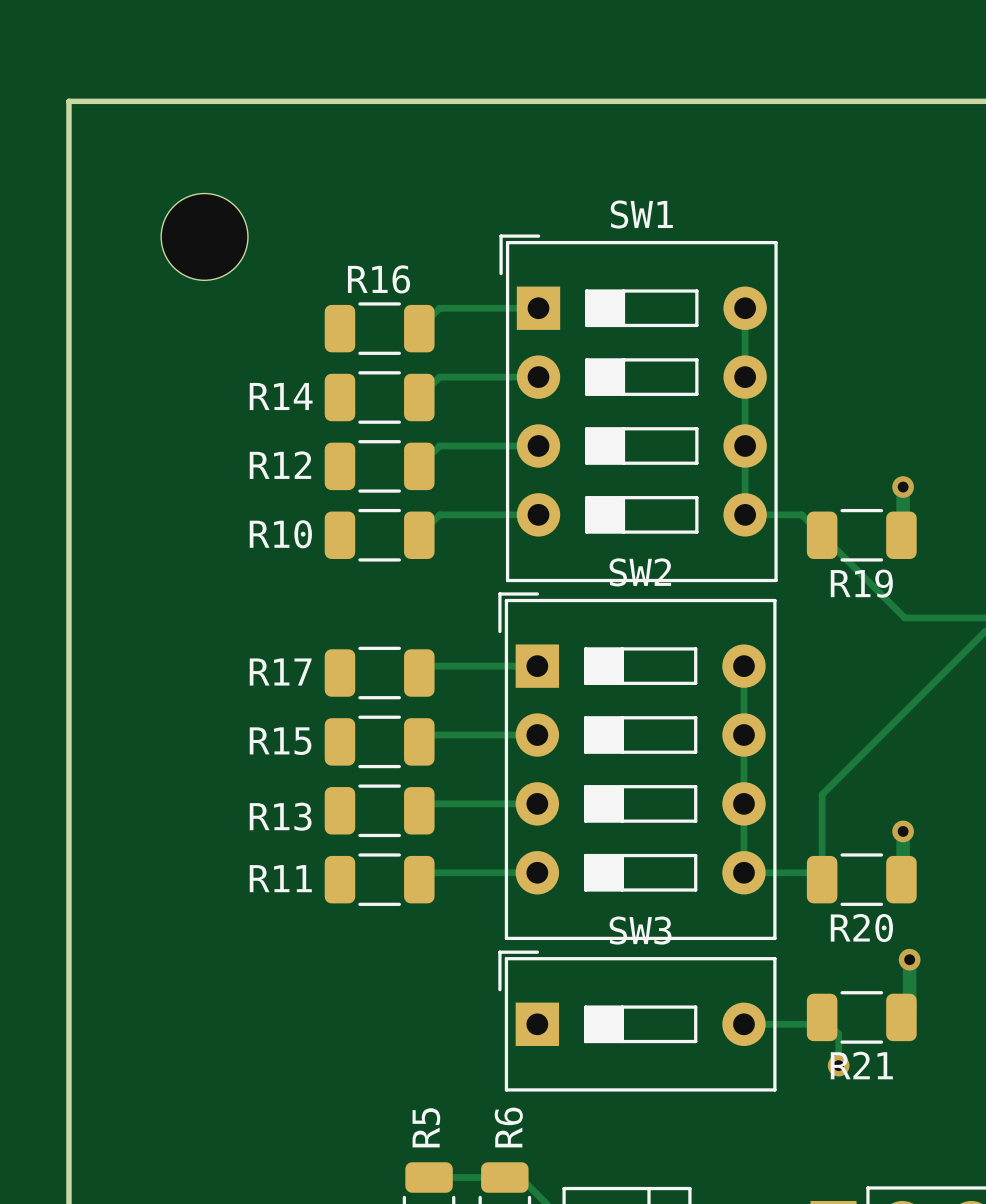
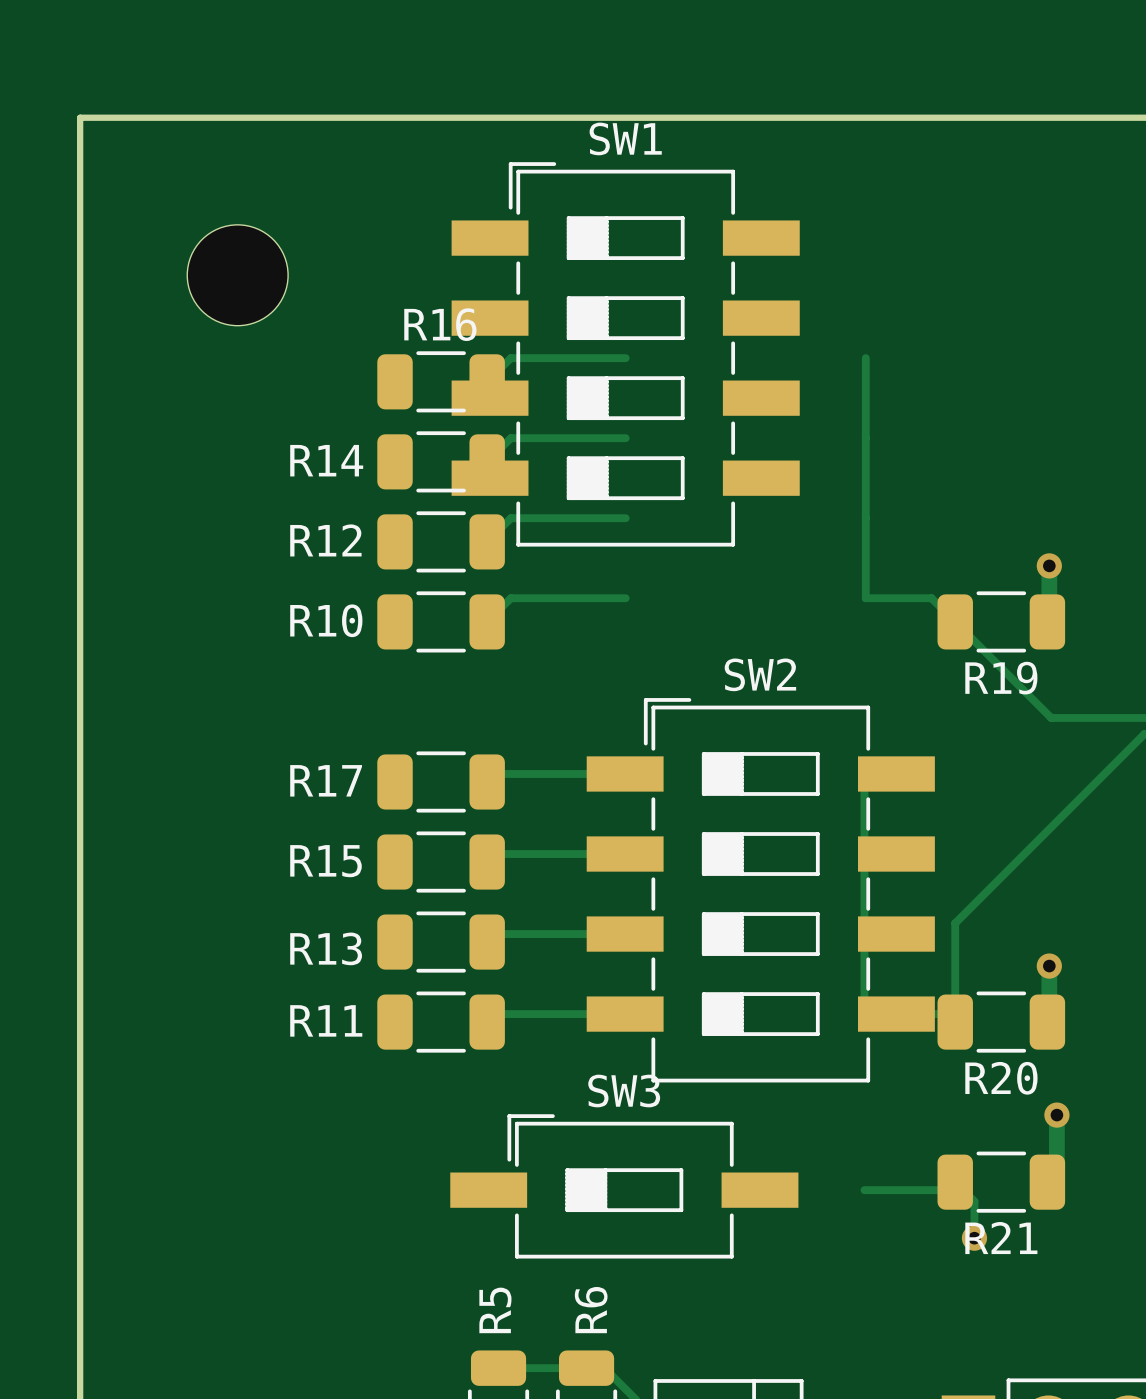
SW1 footprint: [499, 234, 778, 583] -> [451, 162, 800, 547]
SW2 footprint: [498, 592, 777, 941] -> [586, 698, 935, 1083]
SW3 footprint: [498, 950, 777, 1092] -> [450, 1114, 799, 1259]

